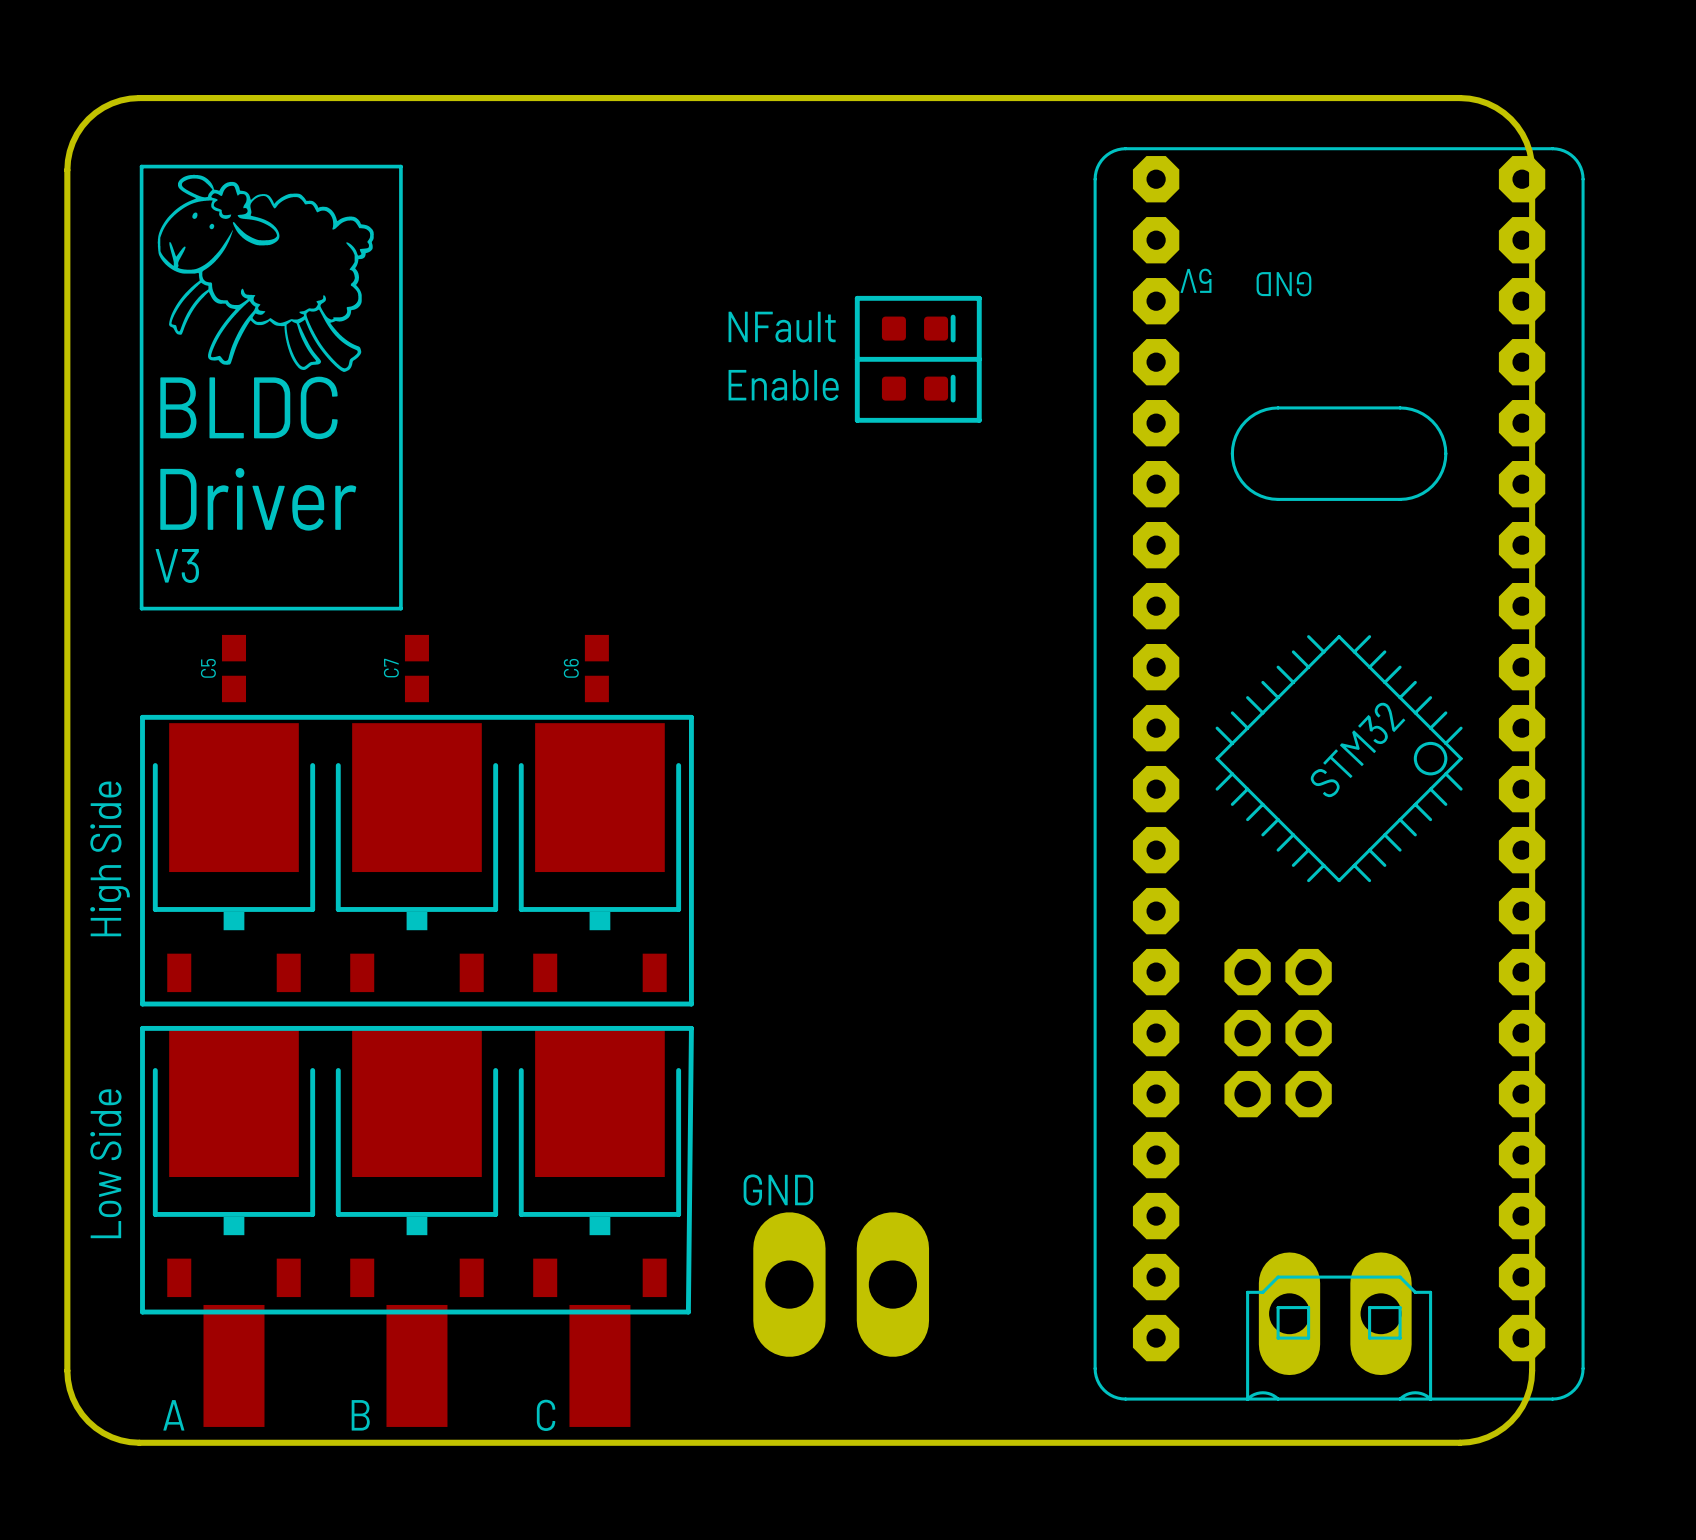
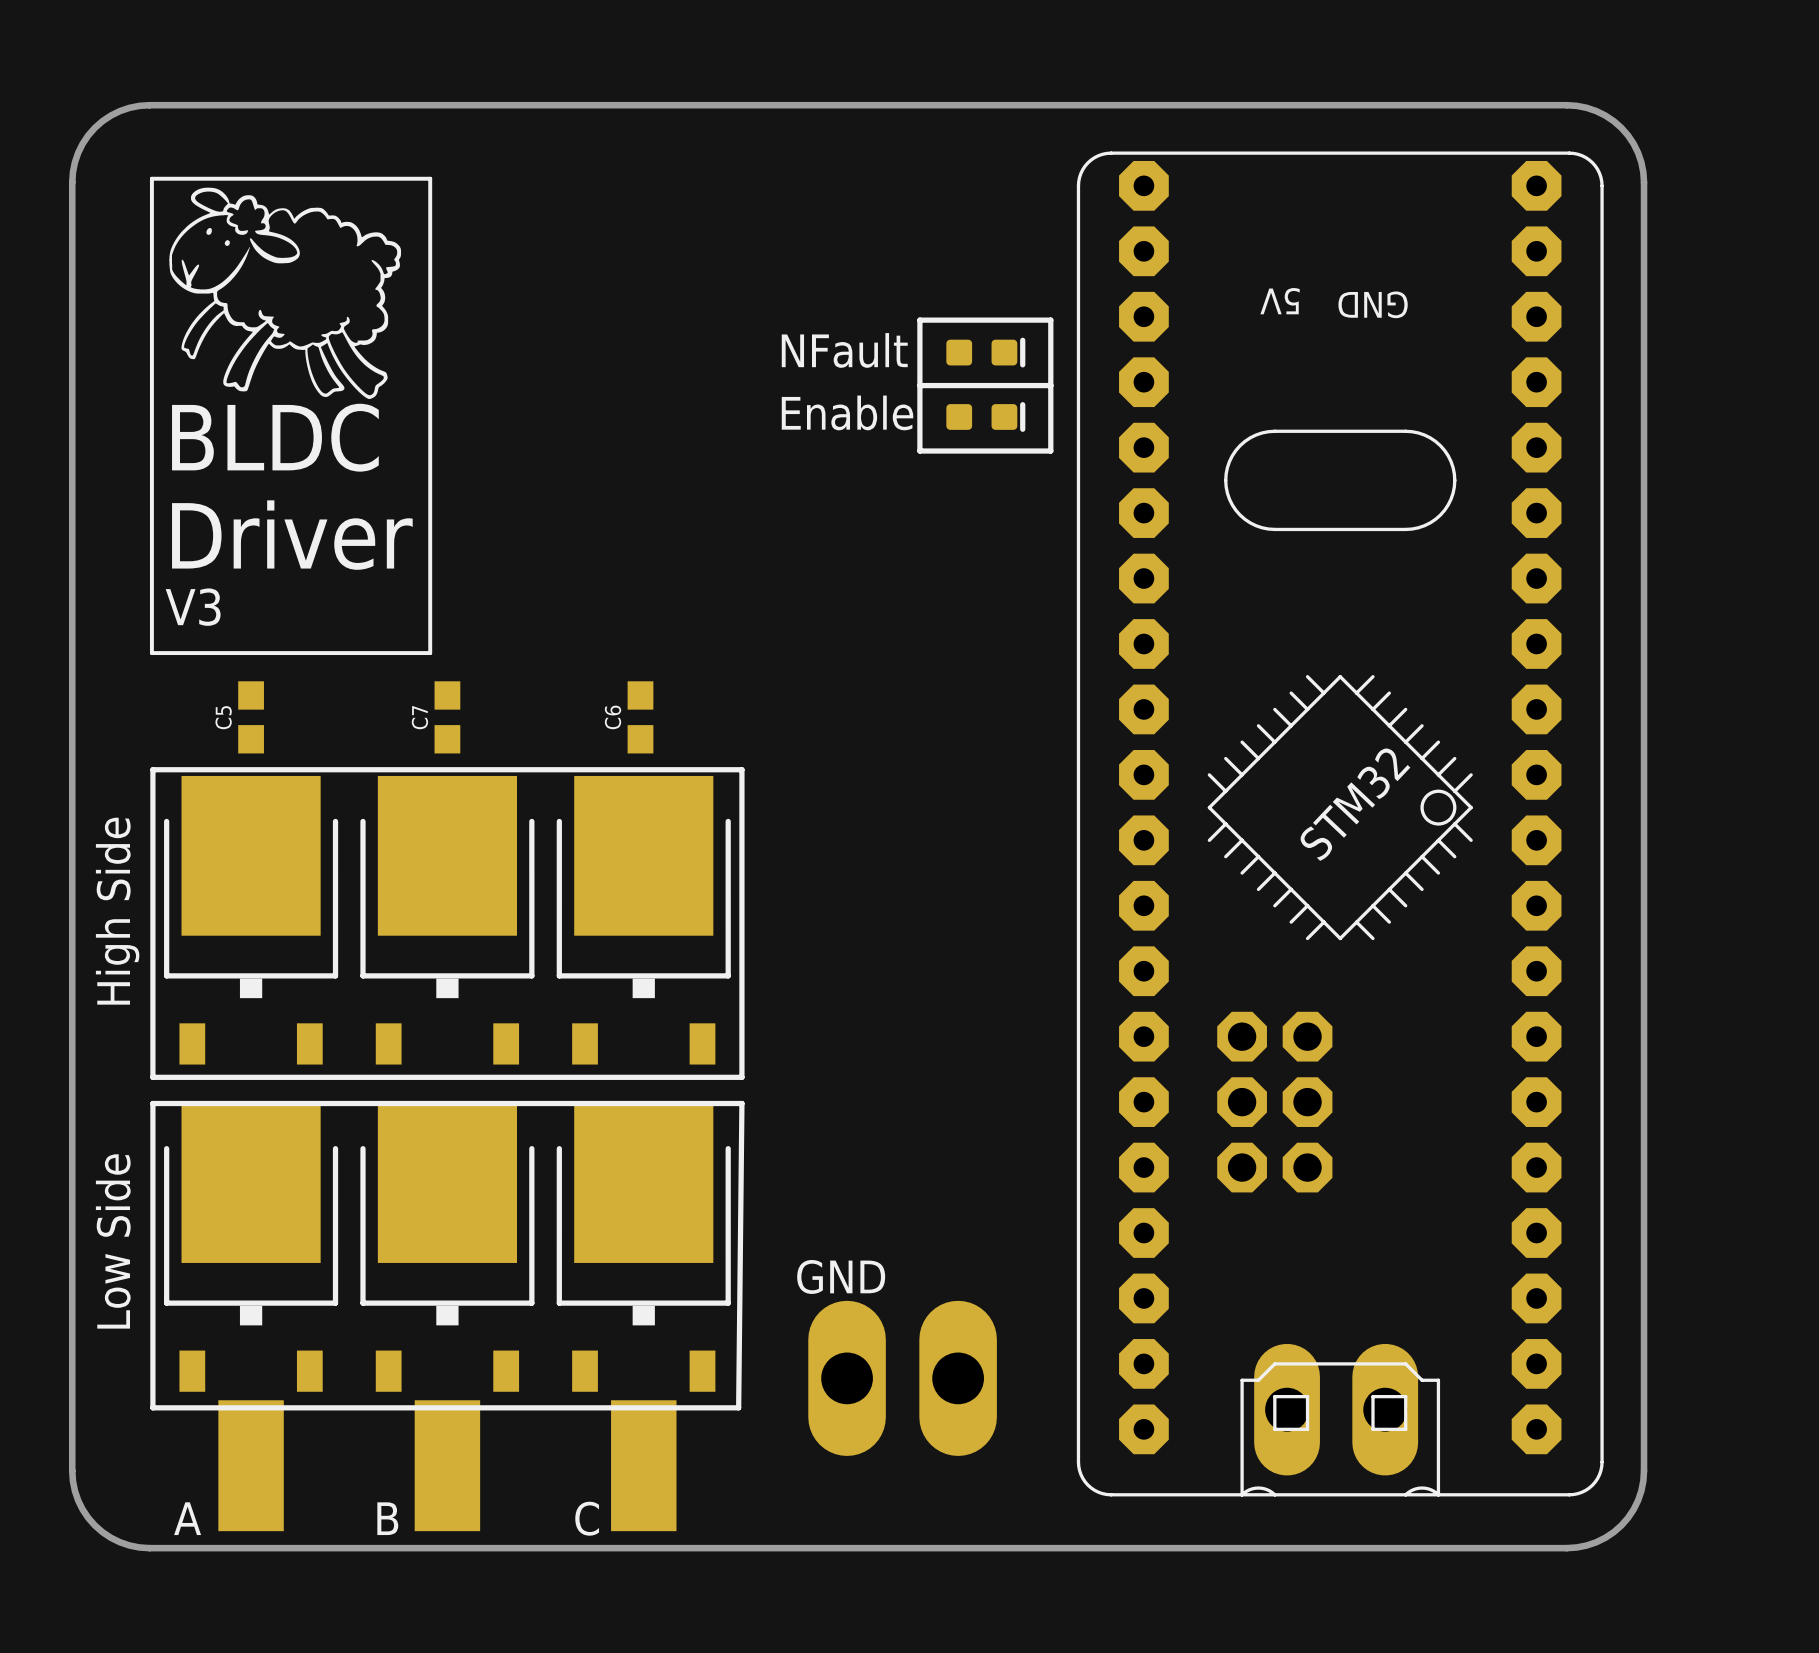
part position: (1339, 773) -> (1340, 823)
part position: (1335, 1313) -> (1336, 1409)

